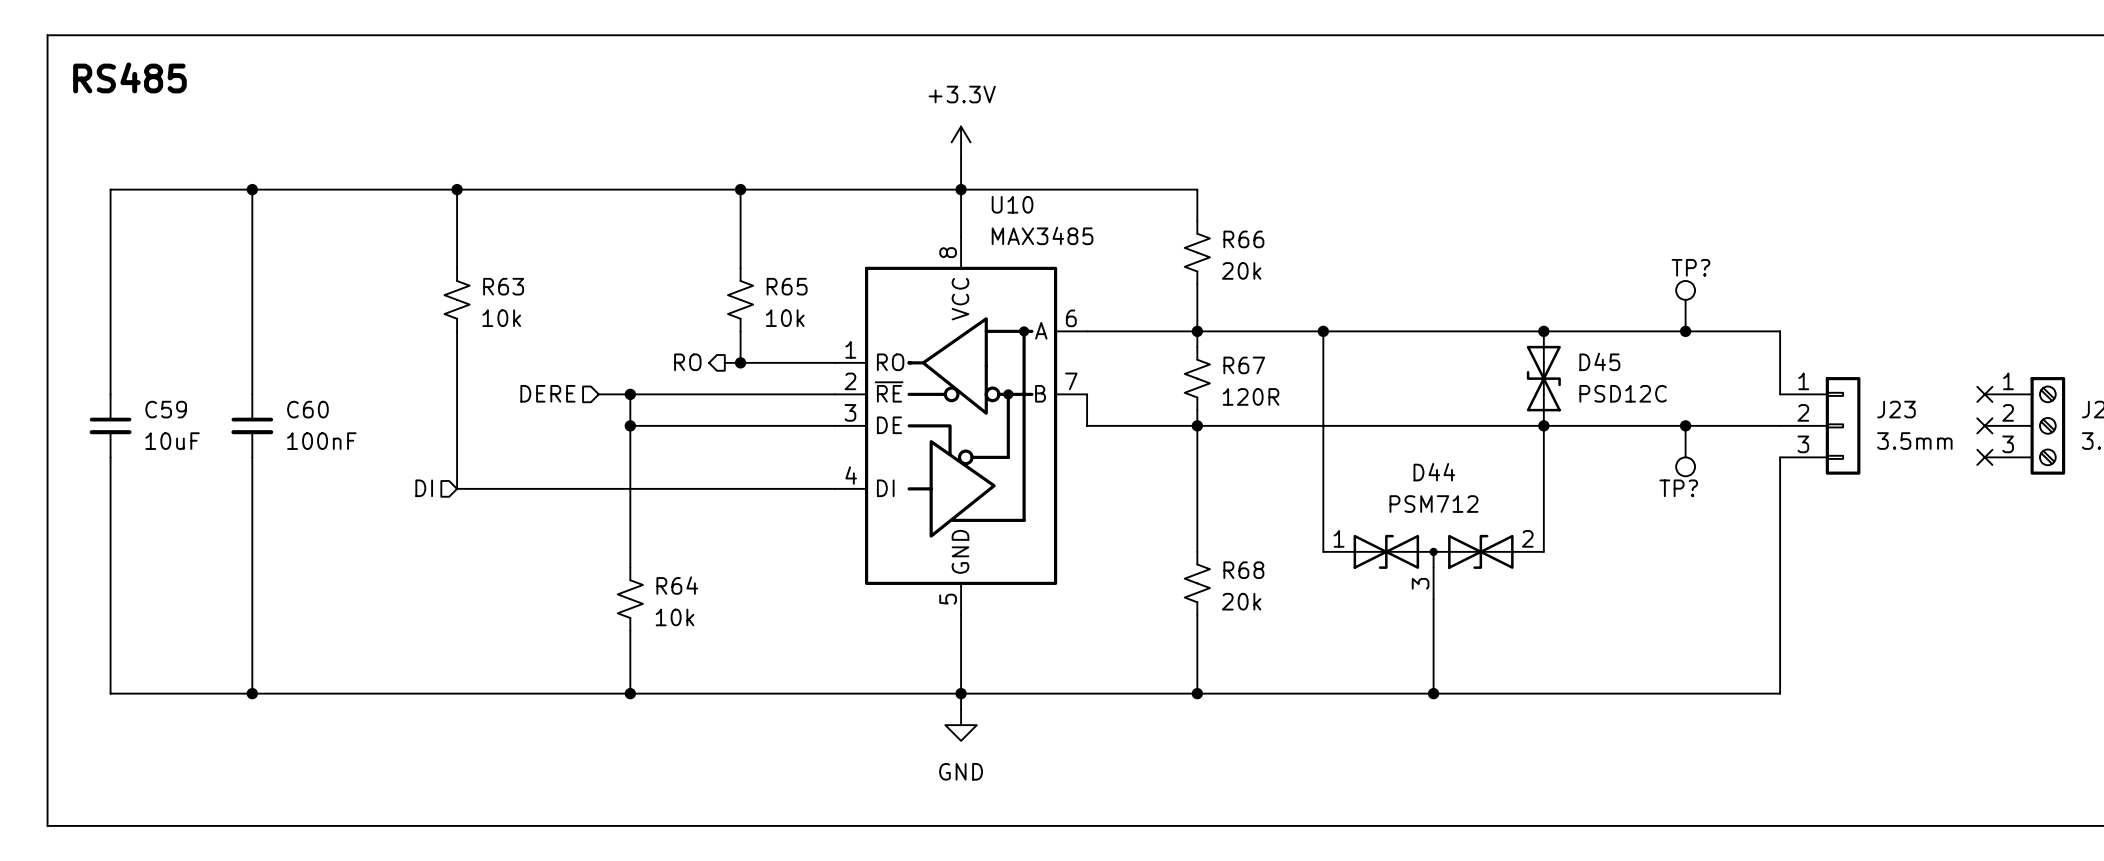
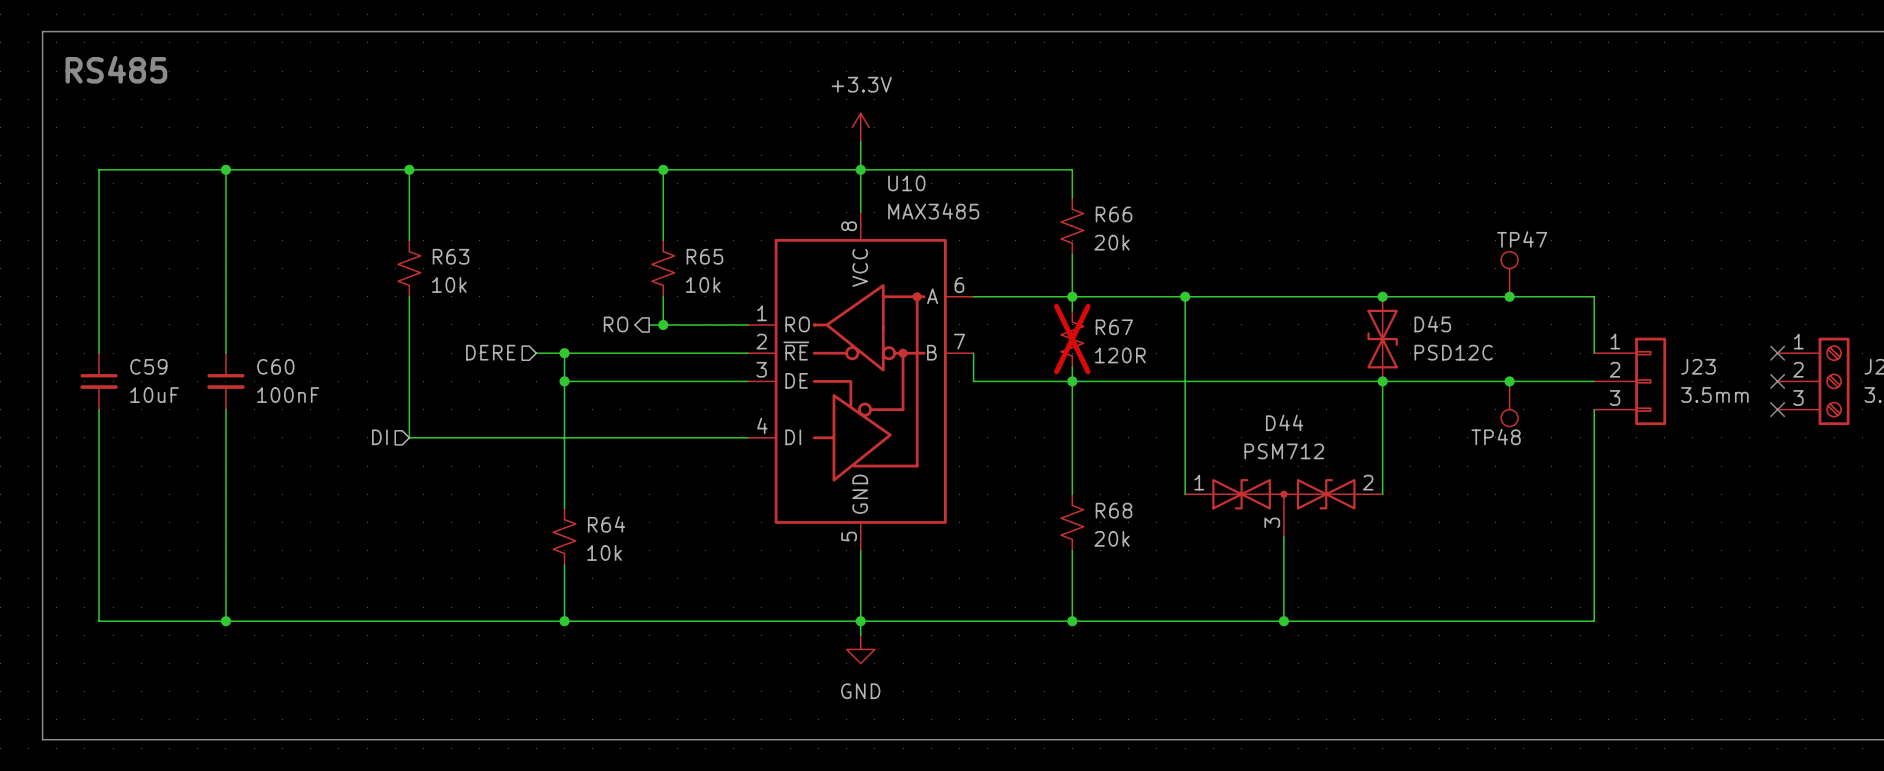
TP? name: TP? (1690, 267) -> TP47 (1522, 239)
R67 do-not-place cross: none -> (1072, 339)
TP? name: TP? (1678, 488) -> TP48 (1496, 436)

